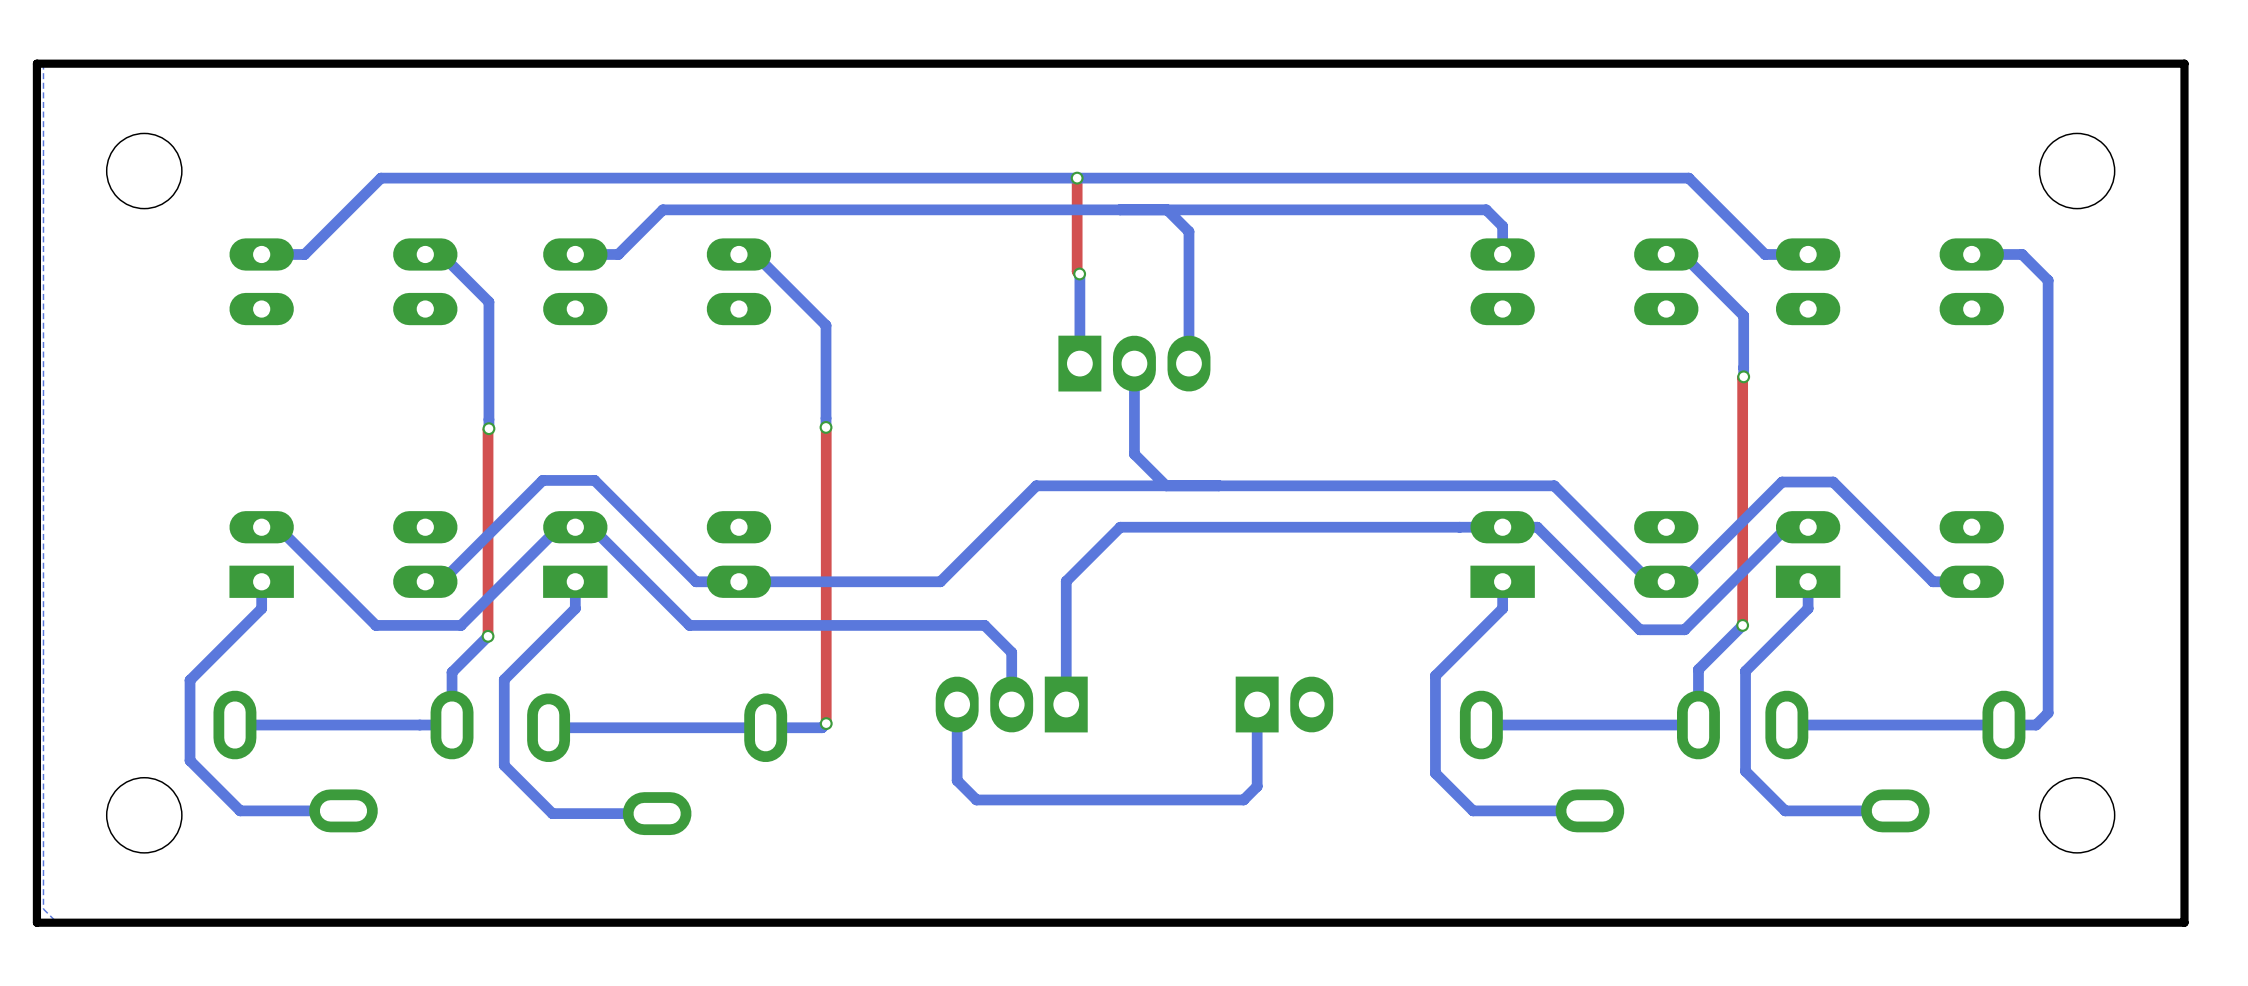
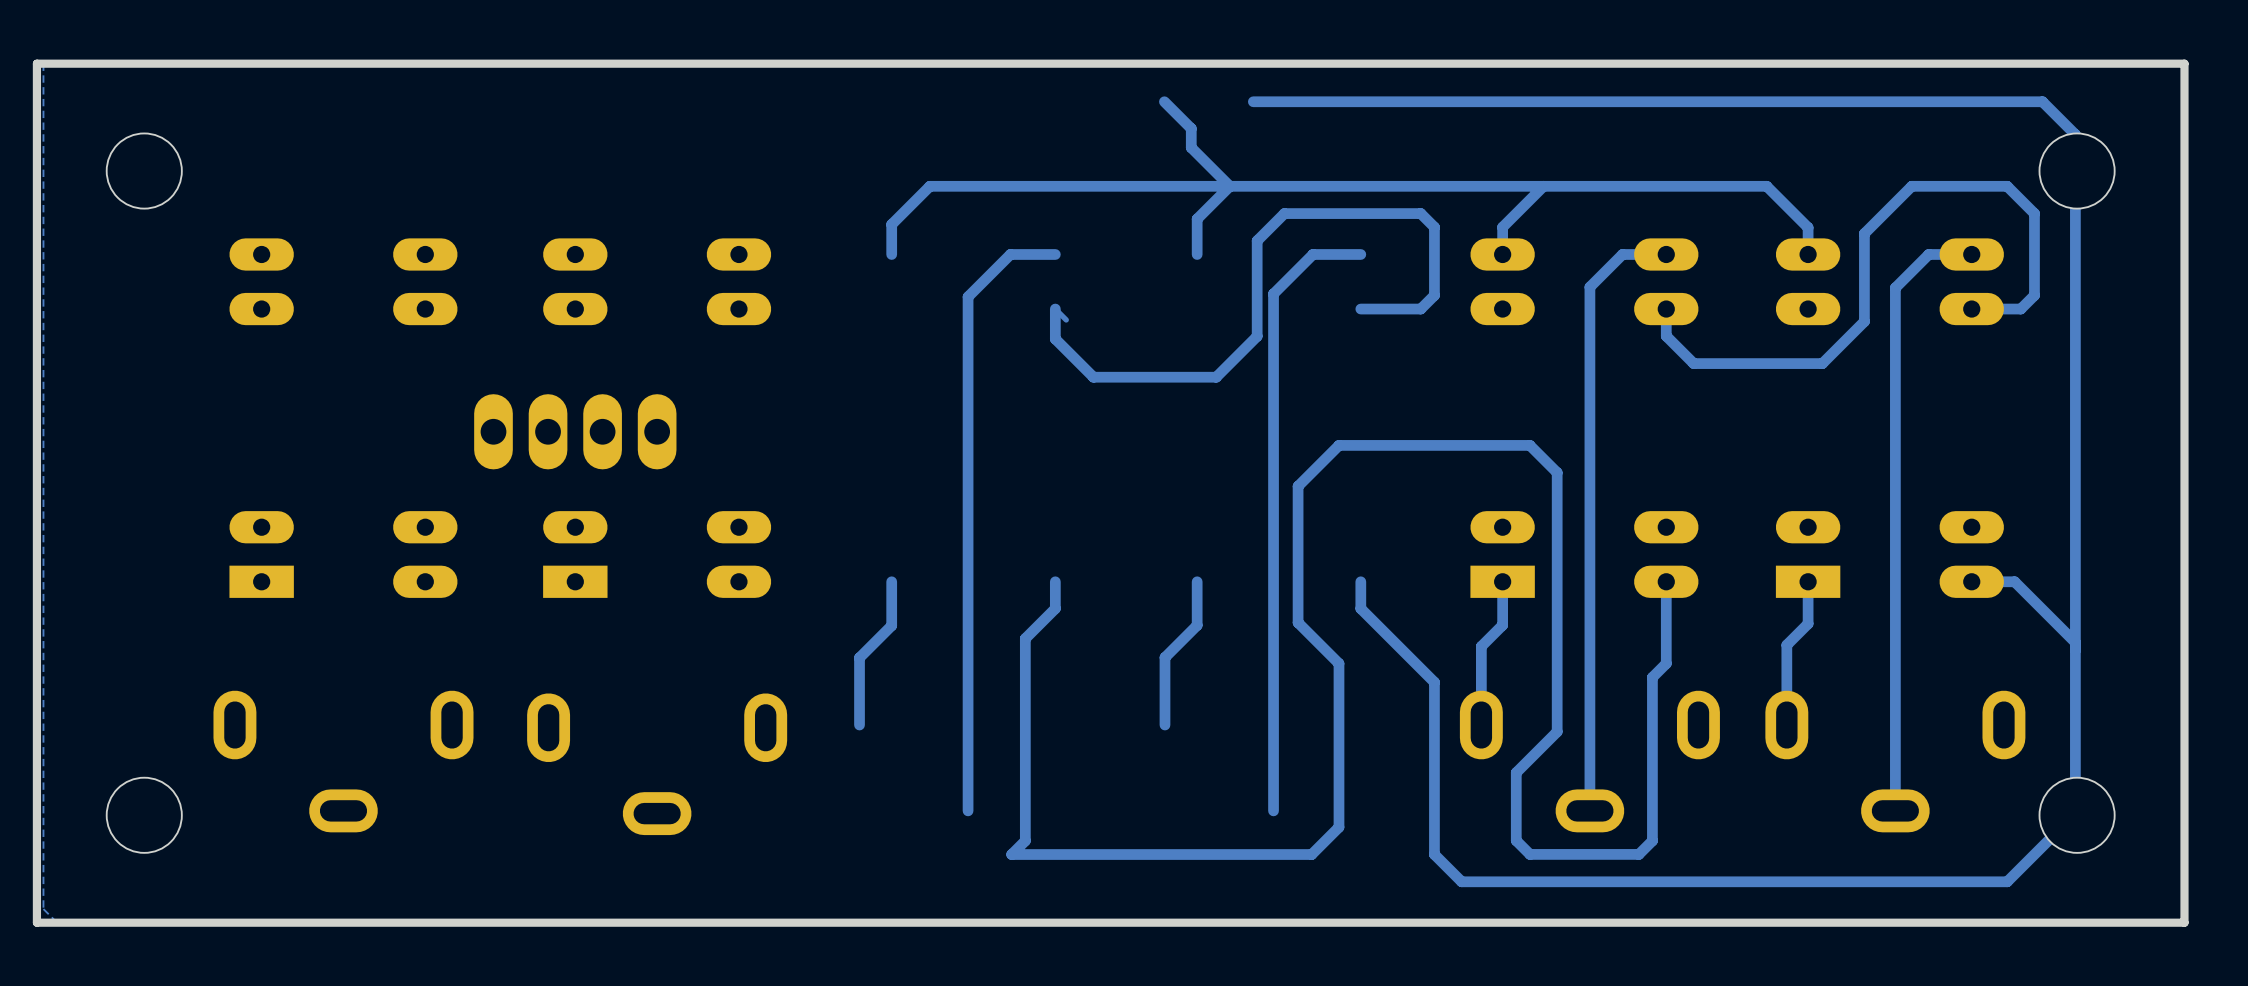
bottom track: none -> (1164, 101) (1191, 128) (1191, 147) (1229, 186) (1197, 219) (1197, 254)
bottom track: none -> (1253, 101) (2042, 101) (2075, 134) (2075, 813) (2007, 881) (1461, 881) (1434, 854) (1434, 682) (1360, 608) (1360, 581)
top track: (1077, 178) (1077, 271) (1079, 273) -> none
via: (1077, 178) -> none
bottom track: (1167, 209) (1188, 231) (1188, 363) -> none
bottom track: (1502, 227) (1486, 209) (662, 209) (618, 254) (575, 254) -> (1502, 227) (1543, 186)
bottom track: (425, 254) (441, 254) (488, 302) (488, 428) -> none
bottom track: (738, 254) (755, 254) (826, 325) (826, 427) -> none
bottom track: none -> (1055, 254) (1010, 254) (968, 296) (968, 810)
bottom track: none -> (1360, 254) (1312, 254) (1273, 293) (1273, 810)
bottom track: (1666, 254) (1682, 254) (1743, 315) (1743, 376) -> (1666, 254) (1622, 254) (1589, 287) (1589, 810)
bottom track: (1808, 254) (1765, 254) (1688, 178) (380, 178) (304, 254) (261, 254) -> (1808, 254) (1808, 227) (1766, 186) (929, 186) (891, 224) (891, 254)
bottom track: (1971, 254) (2022, 254) (2048, 280) (2048, 713) (2036, 725) (1786, 725) -> (1971, 254) (1928, 254) (1895, 287) (1895, 810)
via: (1079, 273) -> none
bottom track: (1079, 274) (1079, 363) -> none
bottom track: none -> (1360, 309) (1420, 309) (1434, 295) (1434, 227) (1420, 213) (1284, 213) (1257, 240) (1257, 336) (1216, 377) (1093, 377) (1055, 339) (1055, 309) (1066, 319)
bottom track: none -> (1971, 309) (2020, 309) (2034, 295) (2034, 213) (2007, 186) (1911, 186) (1864, 233) (1864, 321) (1822, 363) (1693, 363) (1666, 336) (1666, 309)
bottom track: (1134, 363) (1134, 454) (1166, 485) -> none
part: (1134, 363) -> none
top track: (1743, 376) (1742, 625) -> none
via: (1743, 376) -> none
top track: (826, 427) (826, 723) -> none
via: (826, 427) -> none
top track: (488, 428) (488, 636) -> none
via: (488, 428) -> none
part: none -> (575, 431)
bottom track: (261, 527) (277, 527) (375, 625) (461, 625) (559, 527) (591, 527) (689, 625) (984, 625) (1011, 652) (1011, 704) -> none
bottom track: (1808, 527) (1787, 527) (1684, 629) (1639, 629) (1537, 527) (1120, 527) (1066, 581) (1066, 704) -> none
bottom track: (261, 581) (261, 608) (190, 680) (190, 760) (240, 810) (343, 810) -> none
bottom track: (575, 581) (575, 608) (504, 679) (504, 765) (552, 813) (657, 813) -> none
bottom track: none -> (891, 581) (891, 625) (859, 657) (859, 725)
bottom track: none -> (1197, 581) (1197, 625) (1164, 657) (1164, 725)
bottom track: none -> (1666, 581) (1666, 663) (1652, 677) (1652, 840) (1638, 854) (1530, 854) (1516, 840) (1516, 772) (1557, 731) (1557, 472) (1529, 445) (1338, 445) (1298, 486) (1298, 622) (1338, 663) (1338, 827) (1311, 854) (1011, 854) (1025, 840) (1025, 638) (1055, 608) (1055, 581)
bottom track: (1971, 581) (1932, 581) (1833, 482) (1782, 482) (1682, 581) (1650, 581) (1554, 485) (1036, 485) (940, 581) (696, 581) (594, 480) (542, 480) (441, 581) (425, 581) -> (1971, 581) (2014, 581) (2075, 642)
bottom track: (1502, 608) (1435, 675) (1435, 773) (1473, 810) (1589, 810) -> (1502, 608) (1502, 625) (1481, 646) (1481, 725)
bottom track: (1808, 608) (1745, 671) (1745, 771) (1785, 810) (1895, 810) -> (1808, 608) (1808, 623) (1786, 645) (1786, 725)
bottom track: (1742, 625) (1698, 669) (1698, 725) (1481, 725) -> none
via: (1742, 625) -> none
bottom track: (488, 636) (452, 672) (452, 725) (234, 725) -> none
via: (488, 636) -> none
part: (1011, 704) -> none
bottom track: (1257, 704) (1257, 786) (1243, 799) (976, 799) (957, 780) (957, 704) -> none
part: (1284, 704) -> none
bottom track: (826, 723) (822, 727) (548, 727) -> none
via: (826, 723) -> none

